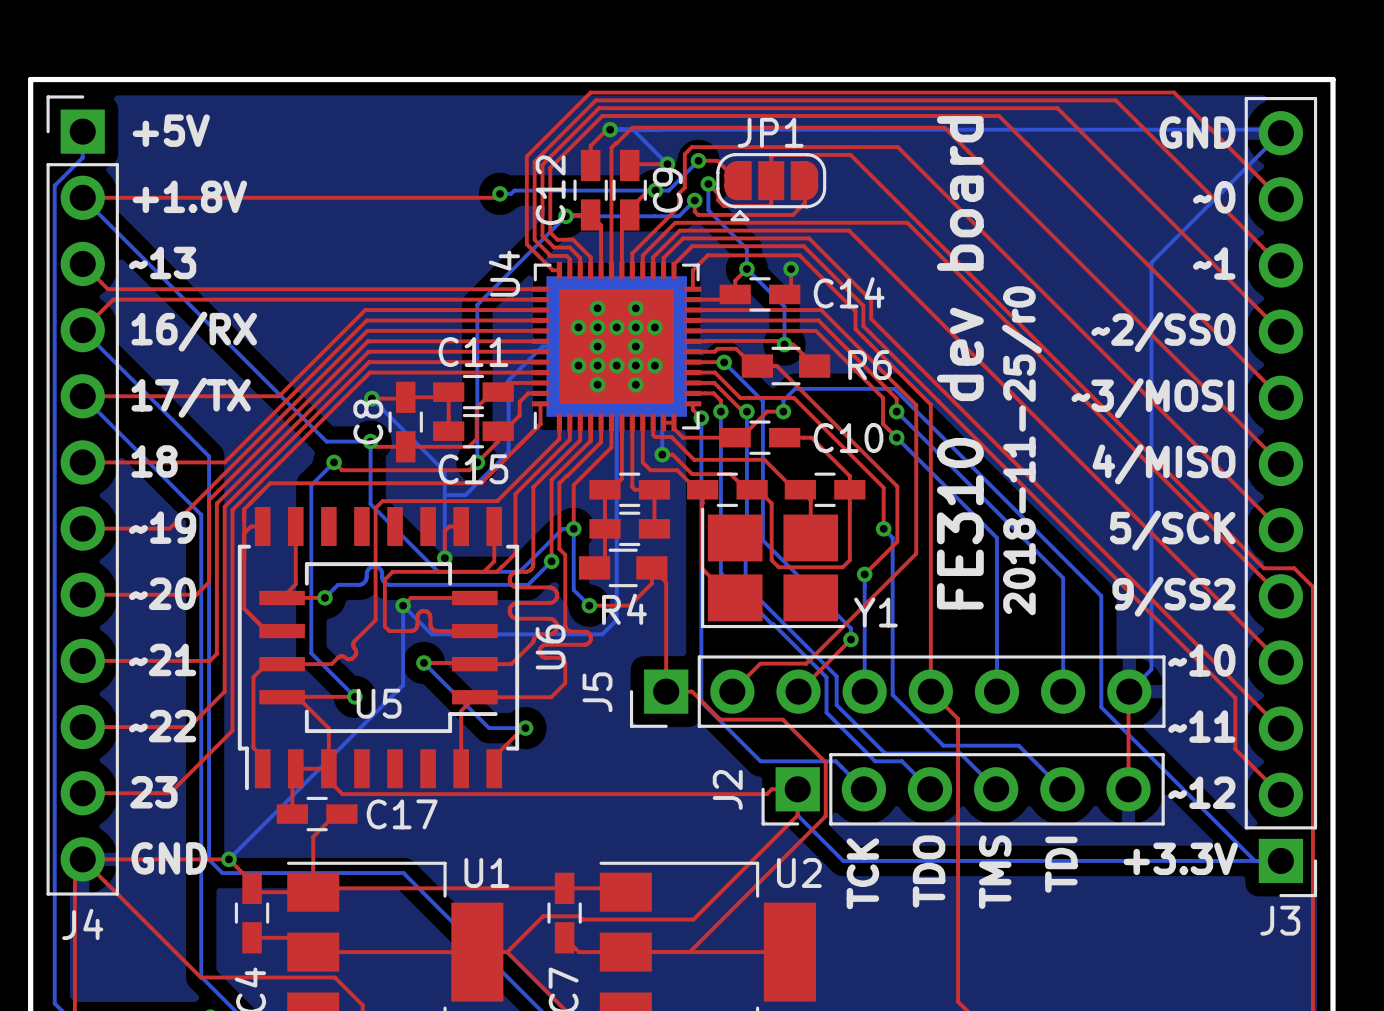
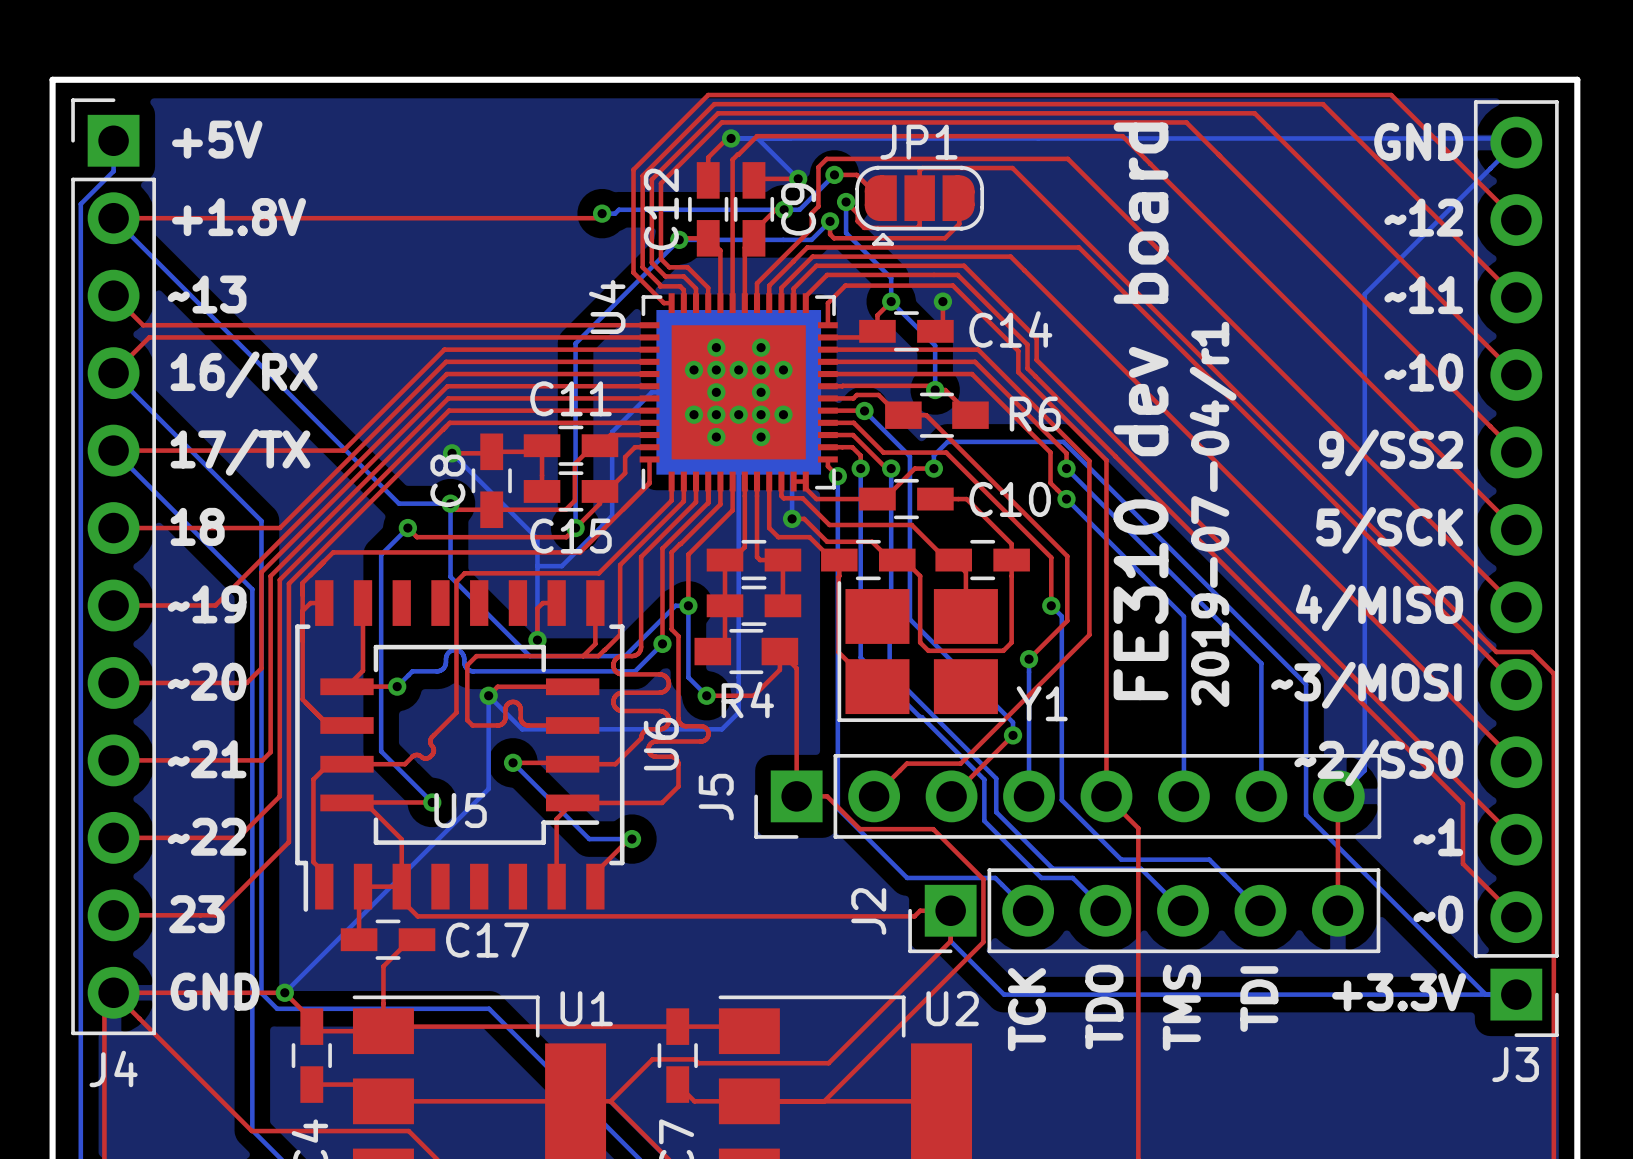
text: ~0 (1214, 197) -> ~12 (1423, 217)
text: ~1 (1214, 263) -> ~11 (1423, 295)
text: ~2/SS0 (1163, 332) -> ~10 (1423, 372)
text: ~3/MOSI (1152, 398) -> 9/SS2 (1391, 452)
text: 2018-11-25/r0 (1021, 450) -> 2019-07-04/r1 (1213, 514)
text: 4/MISO (1164, 464) -> 5/SCK (1389, 530)
text: 5/SCK (1172, 530) -> 4/MISO (1379, 607)
text: 9/SS2 (1173, 596) -> ~3/MOSI (1366, 685)
text: ~10 (1201, 660) -> ~2/SS0 (1378, 762)
text: ~11 (1201, 726) -> ~1 (1438, 837)
text: ~12 (1201, 792) -> ~0 (1438, 914)

